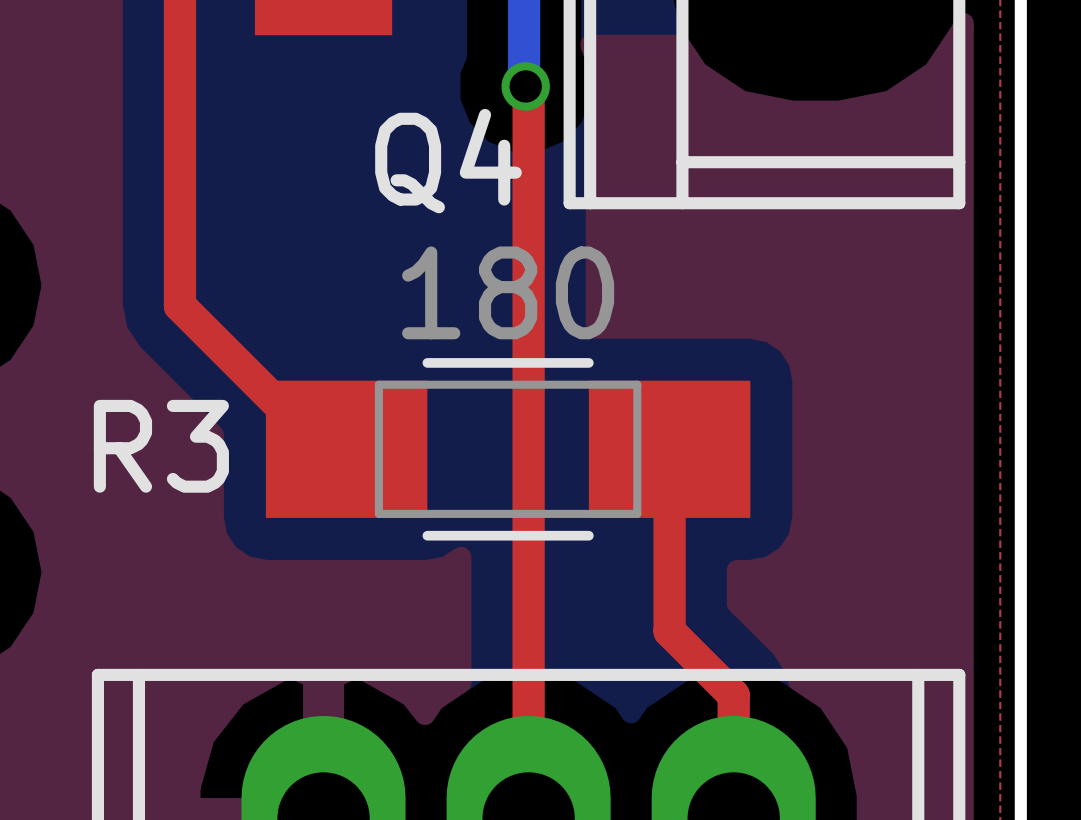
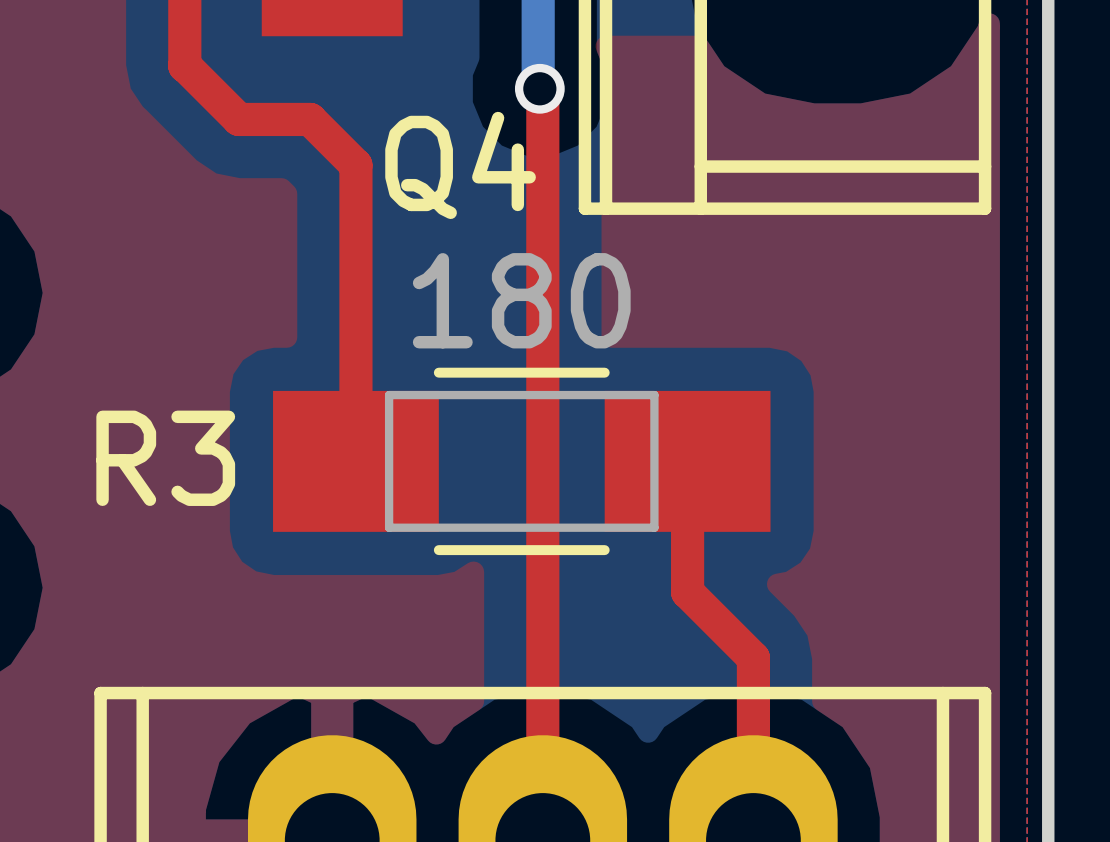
top track: (179, 64) (179, 305) (323, 449) -> (184, 65) (238, 119) (310, 119) (355, 165) (355, 461)
top track: (669, 576) (669, 631) (733, 695) -> (687, 592) (753, 658) (753, 714)

